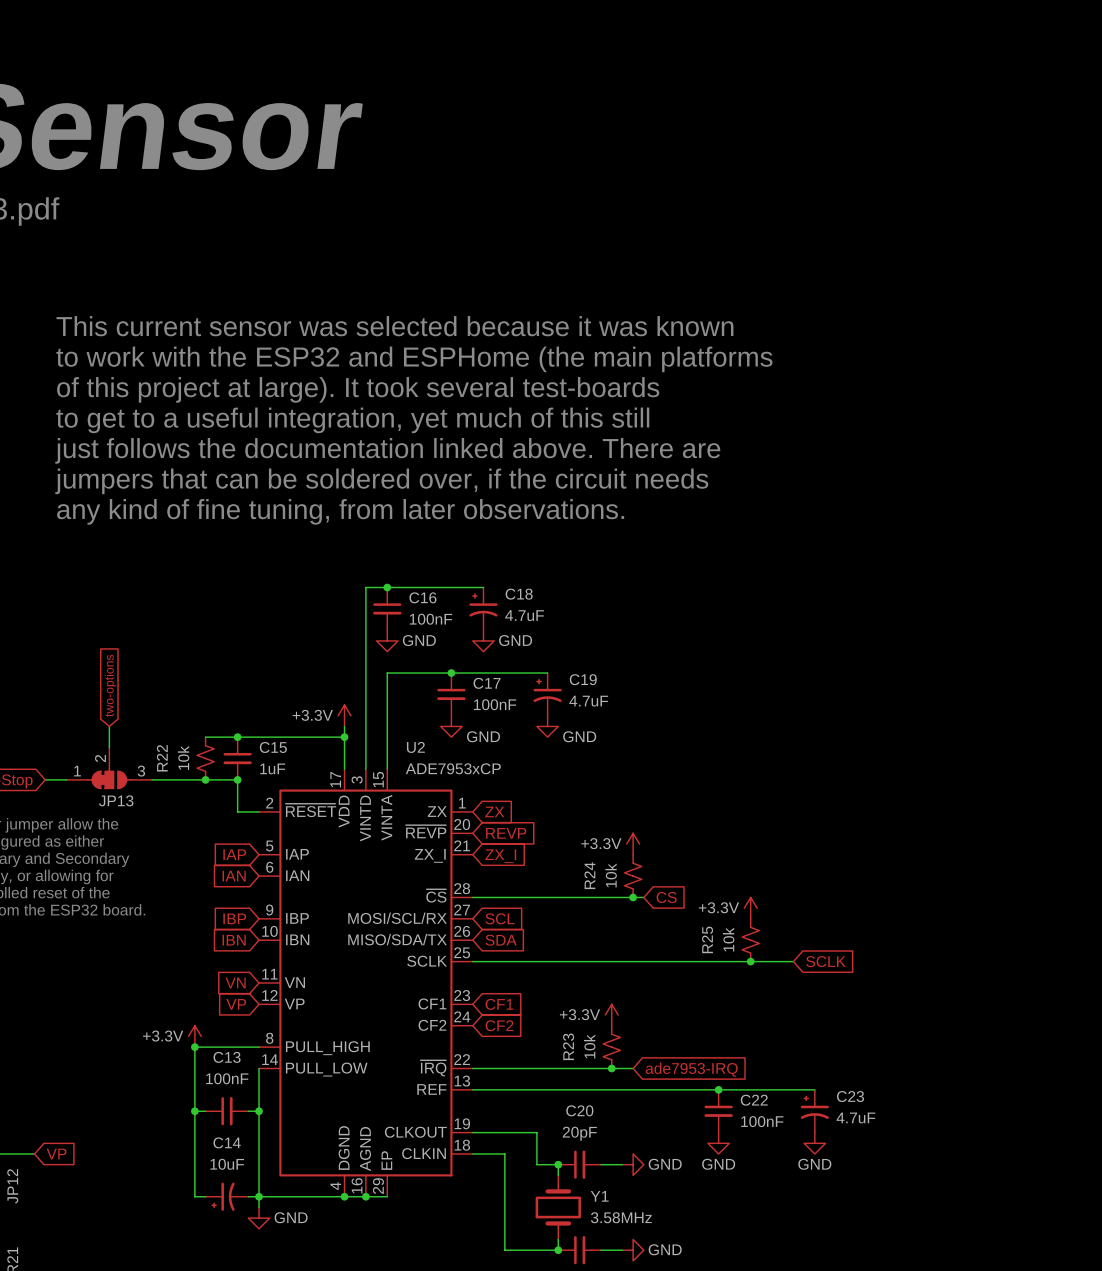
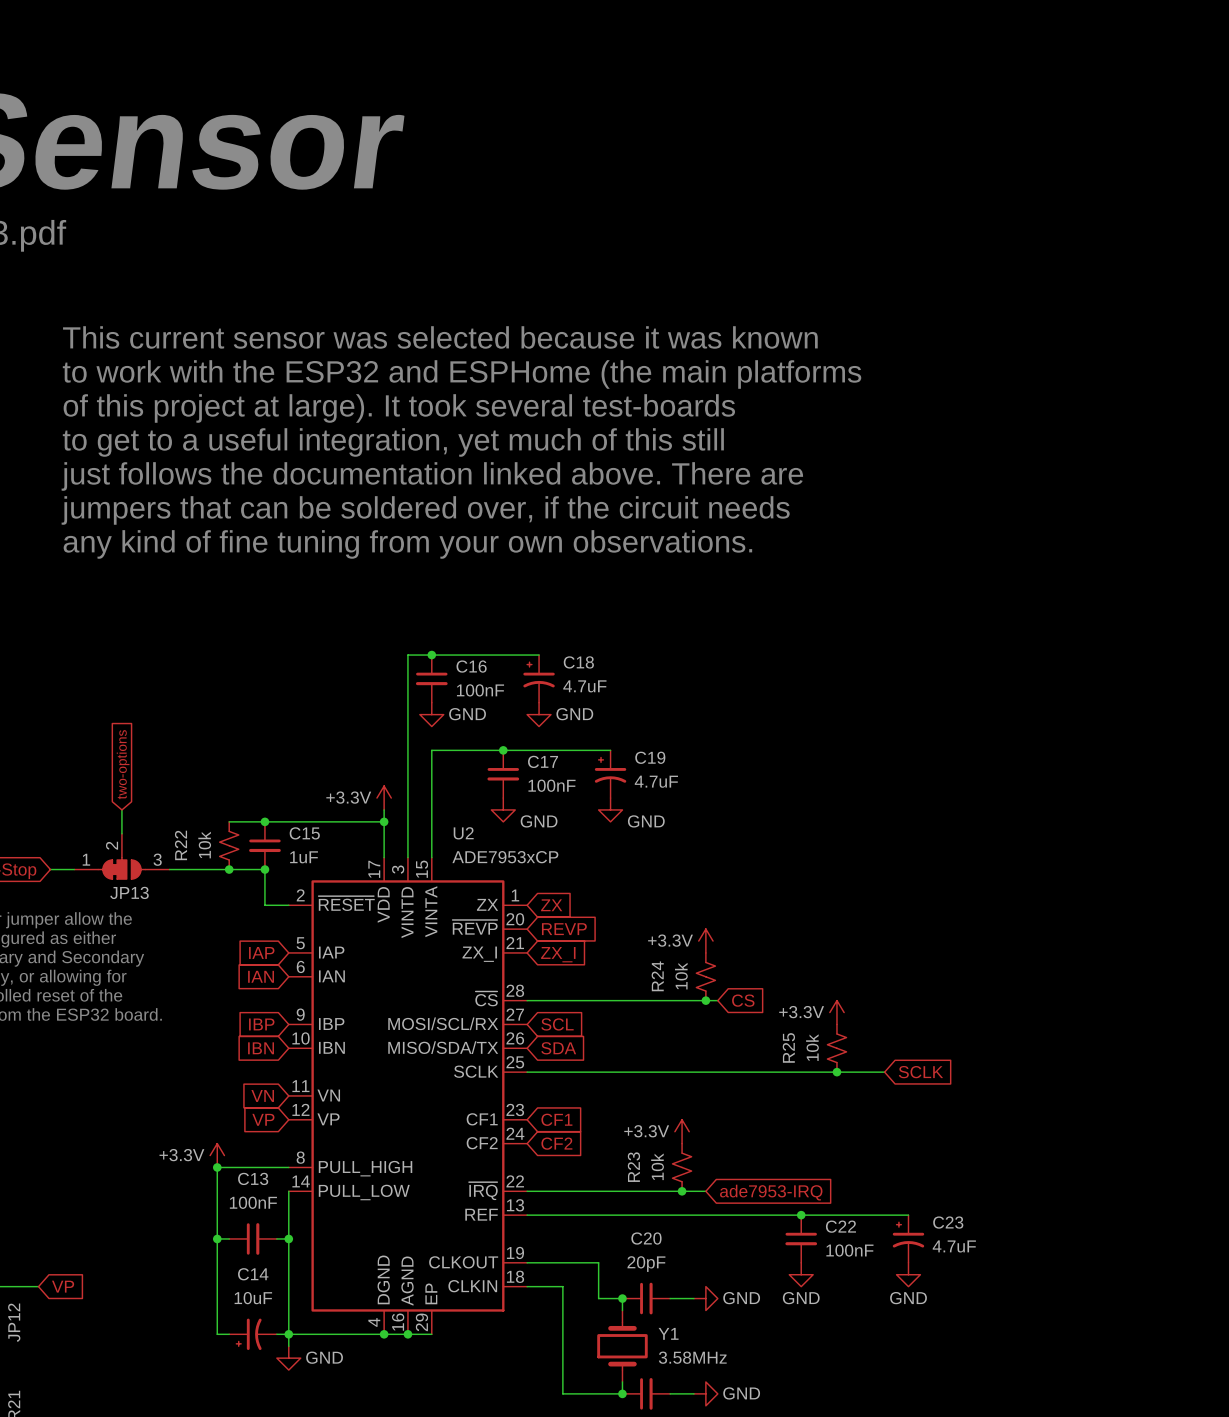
text: none -> This current sensor was selected because it was known (440, 337)
text: This current sensor was selected because it was known (394, 326) -> to work with the ESP32 and ESPHome (the main platforms (462, 374)
text: to work with the ESP32 and ESPHome (the main platforms (414, 359) -> of this project at large). It took several test-boards (399, 408)
text: of this project at large). It took several test-boards (358, 389) -> to get to a useful integration, yet much of this still (393, 442)
text: to get to a useful integration, yet much of this still (352, 420) -> just follows the documentation linked above. There are (432, 476)
text: just follows the documentation linked above. There are (387, 450) -> jumpers that can be soldered over, if the circuit needs (425, 510)
text: jumpers that can be soldered over, if the circuit needs (381, 481) -> any kind of fine tuning from your own observations. (407, 544)
text: any kind of fine tuning, from later observations. (340, 511) -> none

